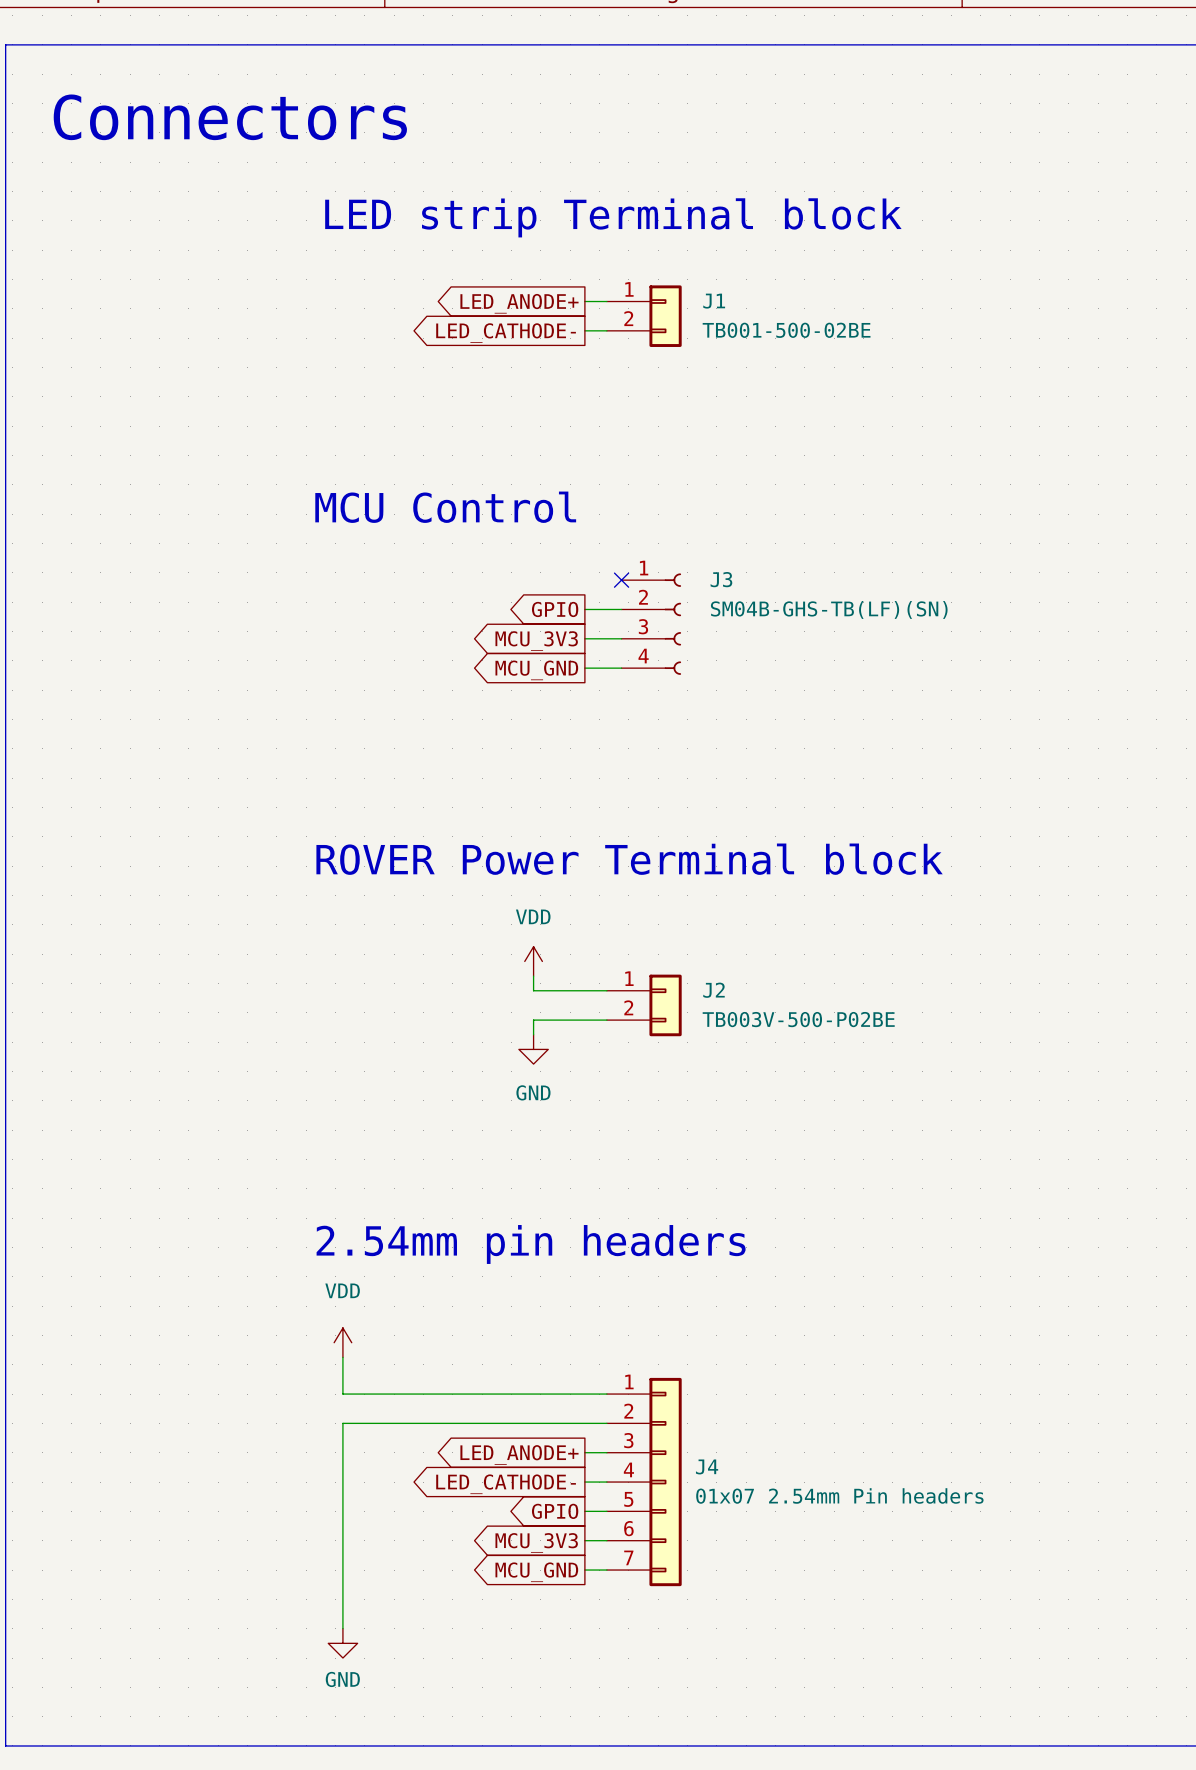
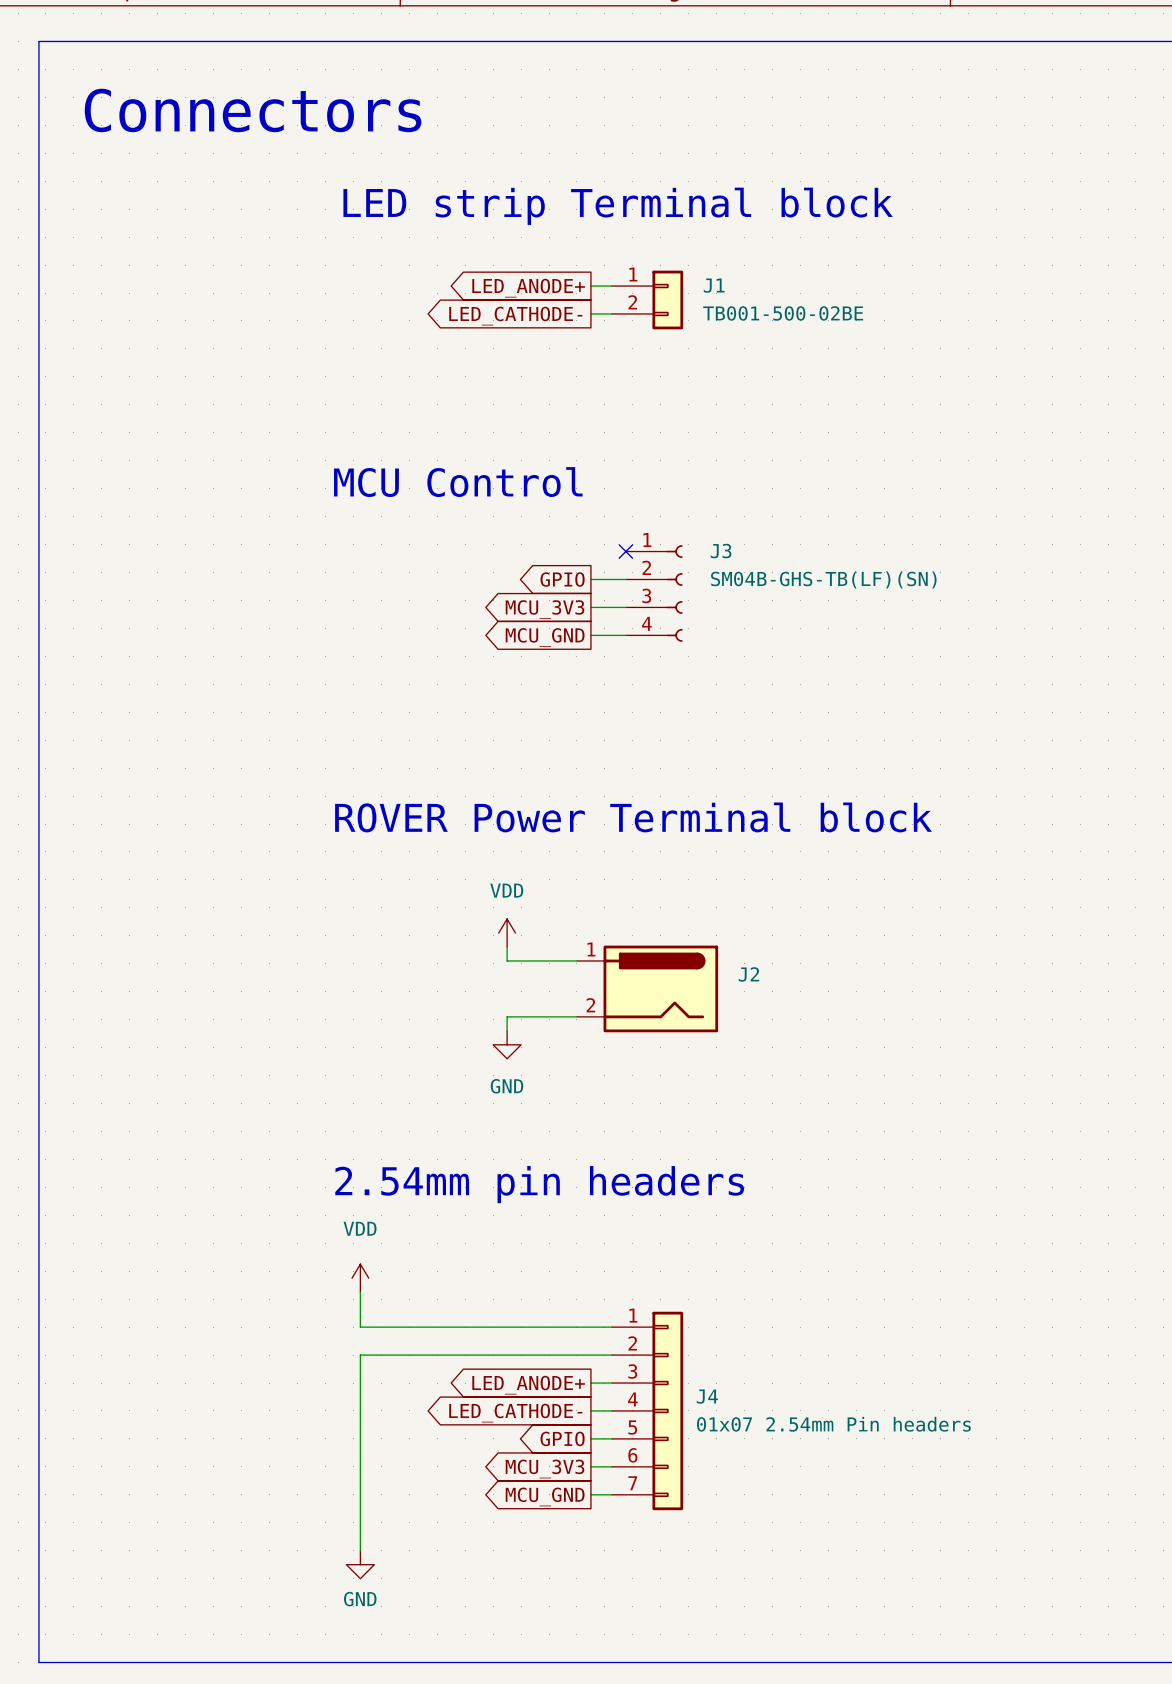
power symbol position: VDD (533, 961) -> VDD (507, 933)
J2 symbol: [606, 974, 682, 1037] -> [576, 945, 719, 1033]
wire: (533, 976) (533, 990) (606, 990) -> (507, 947) (507, 960) (576, 960)
J2 name position: J2 (714, 990) -> J2 (748, 974)
J2 value: TB003V-500-P02BE (798, 1019) -> none
wire: (606, 1020) (533, 1020) (533, 1034) -> (576, 1016) (507, 1016) (507, 1030)
power symbol position: GND (533, 1049) -> GND (507, 1044)

